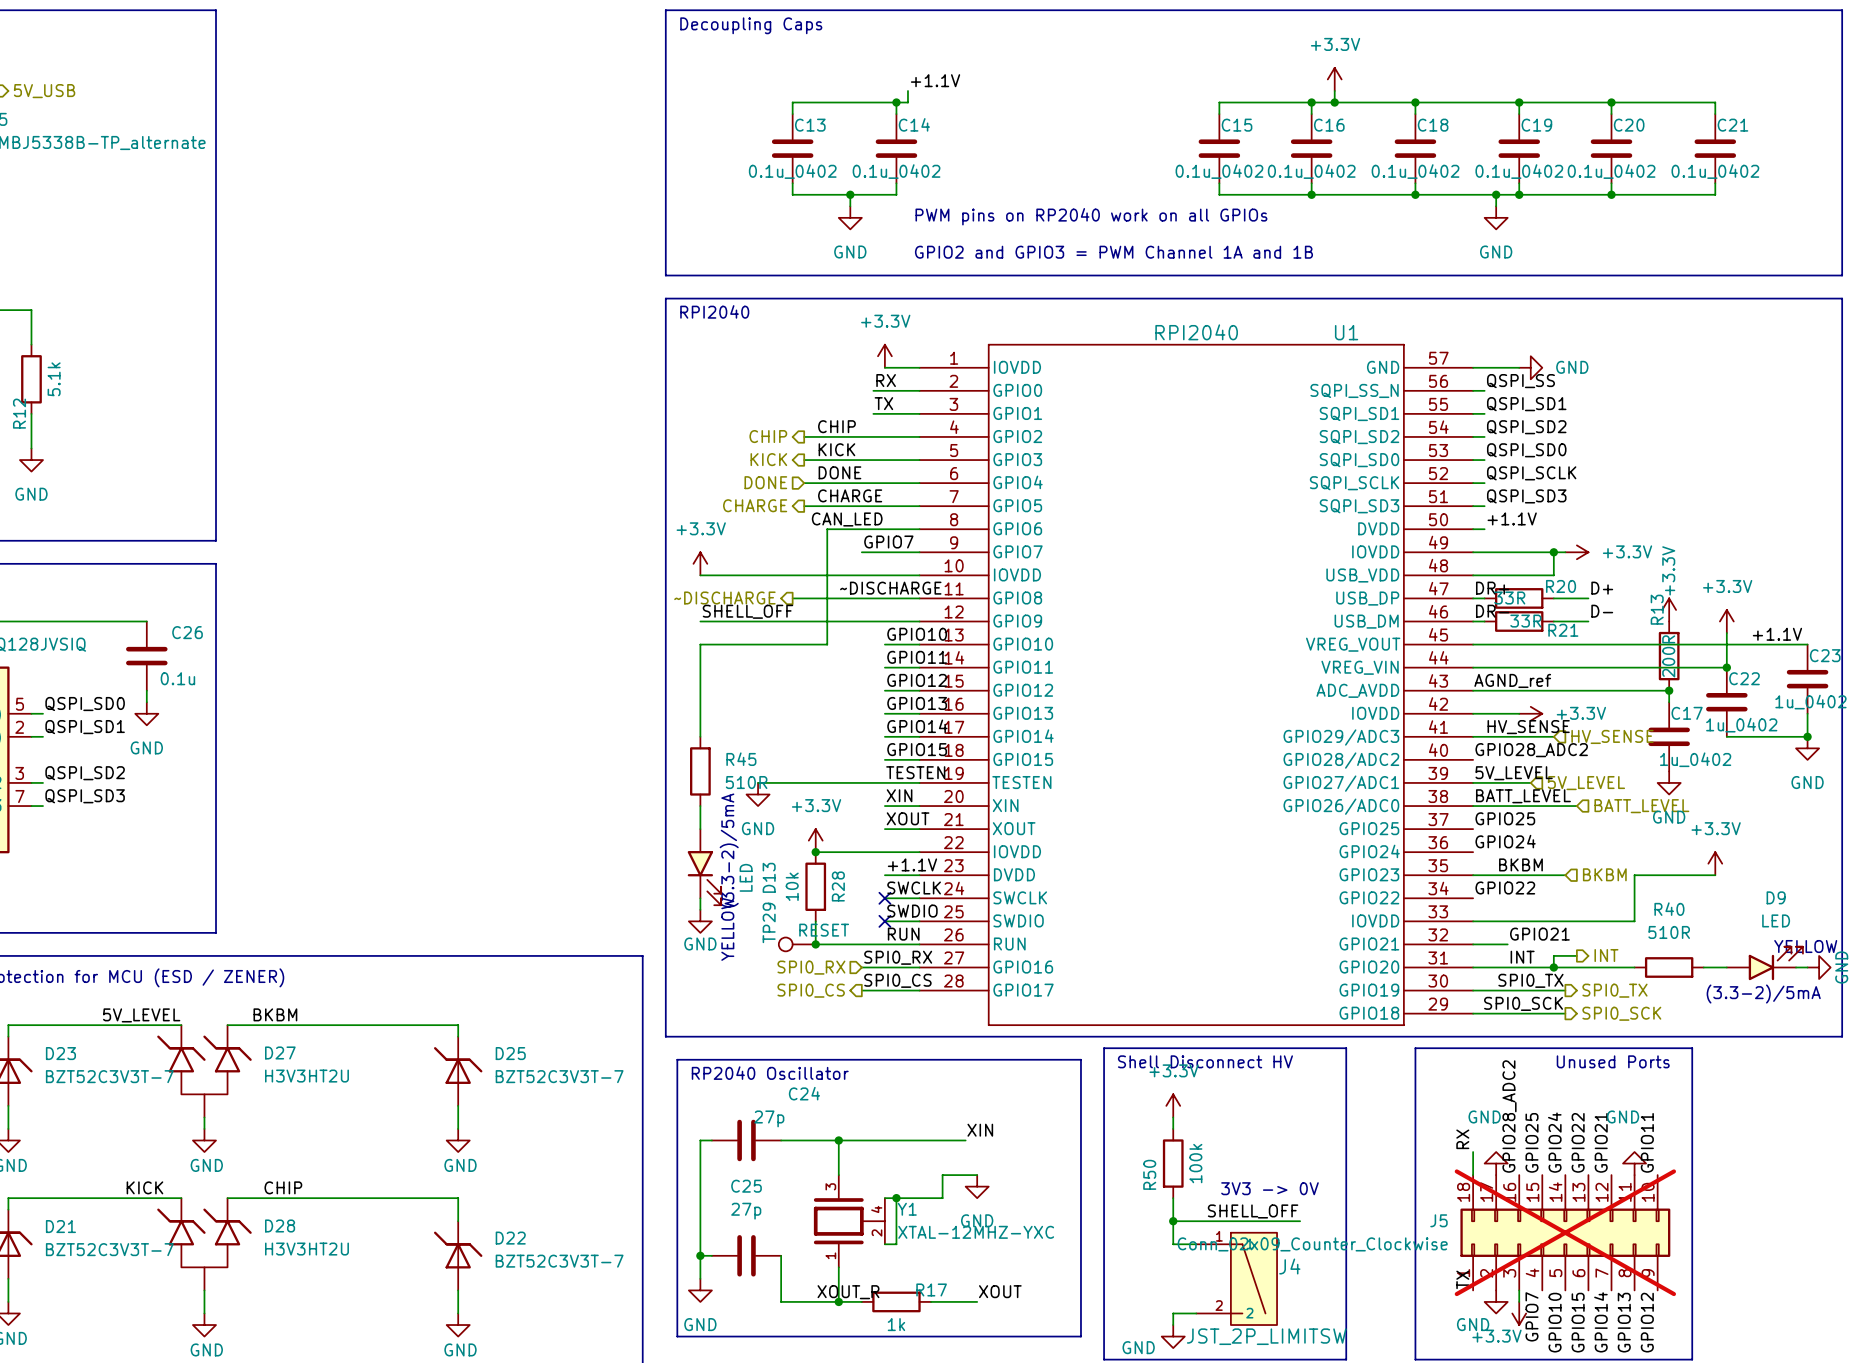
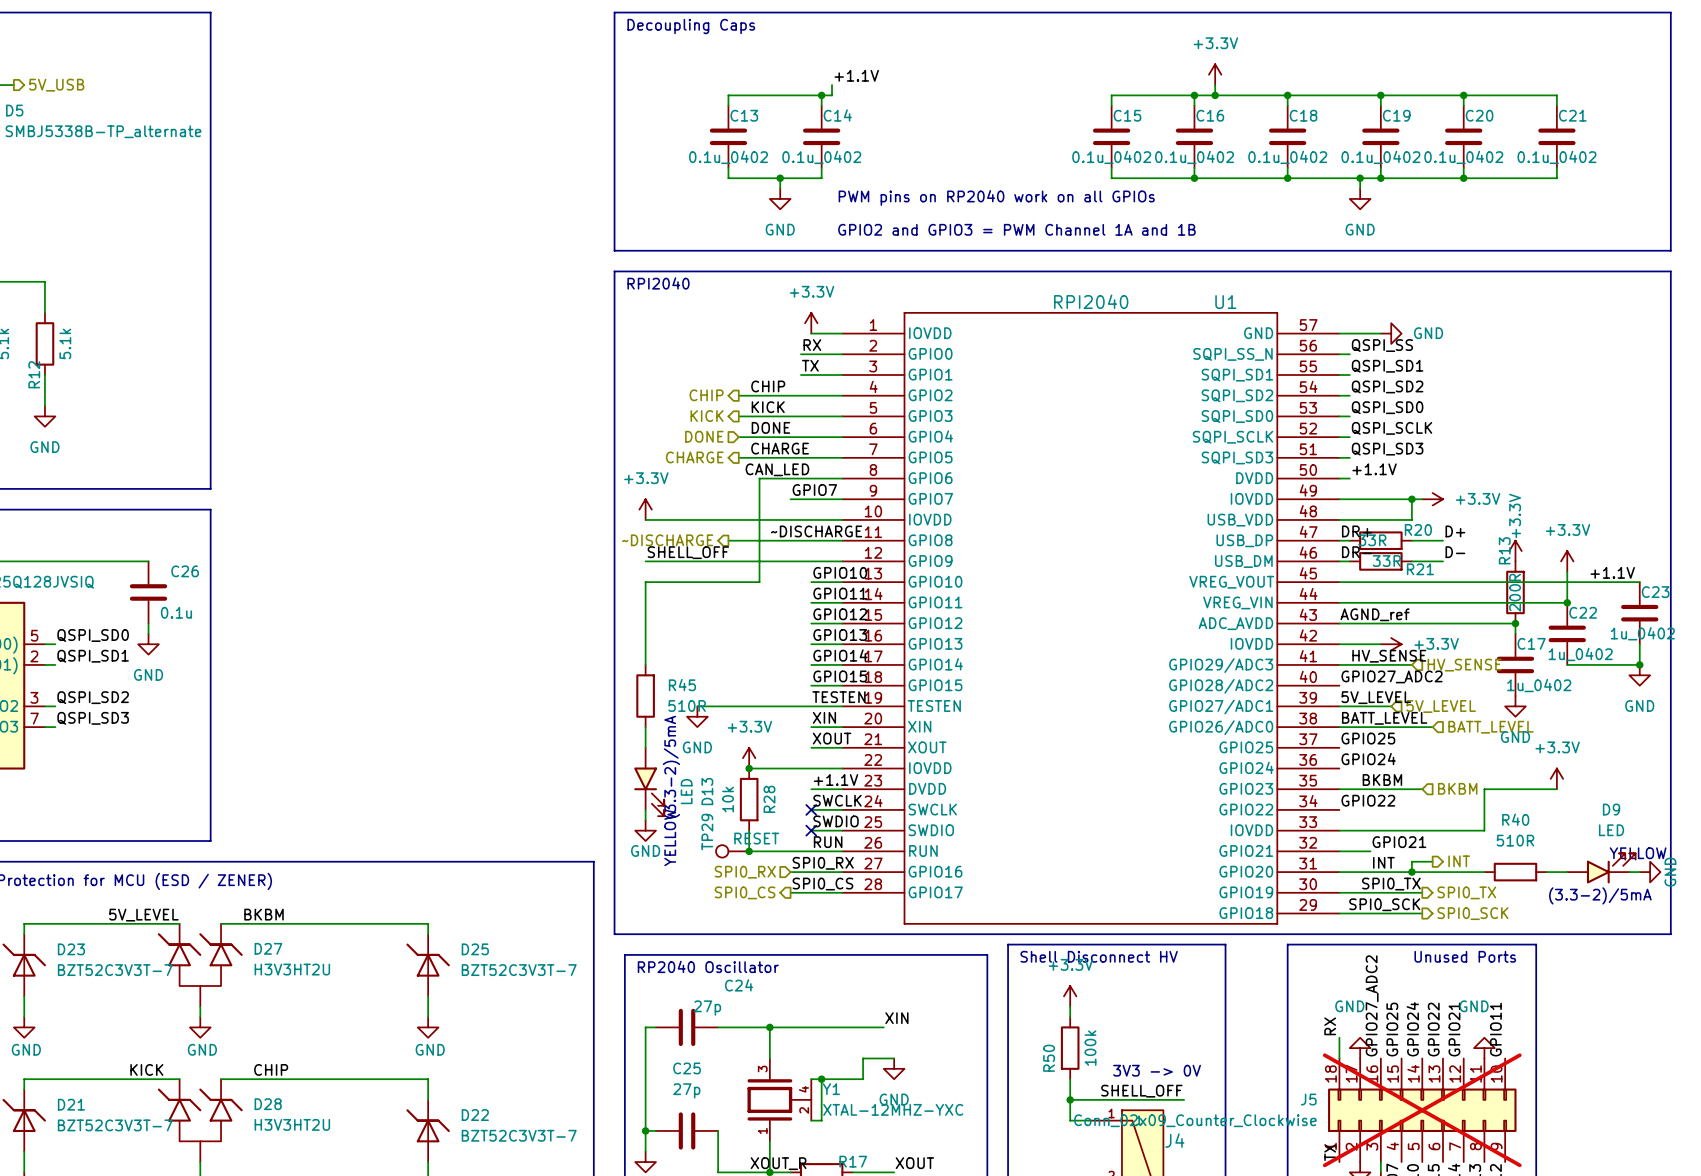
label: GPIO28_ADC2 (1531, 750) -> GPIO27_ADC2 (1392, 676)
label: GPIO28_ADC2 (1509, 1116) -> GPIO27_ADC2 (1372, 1005)

